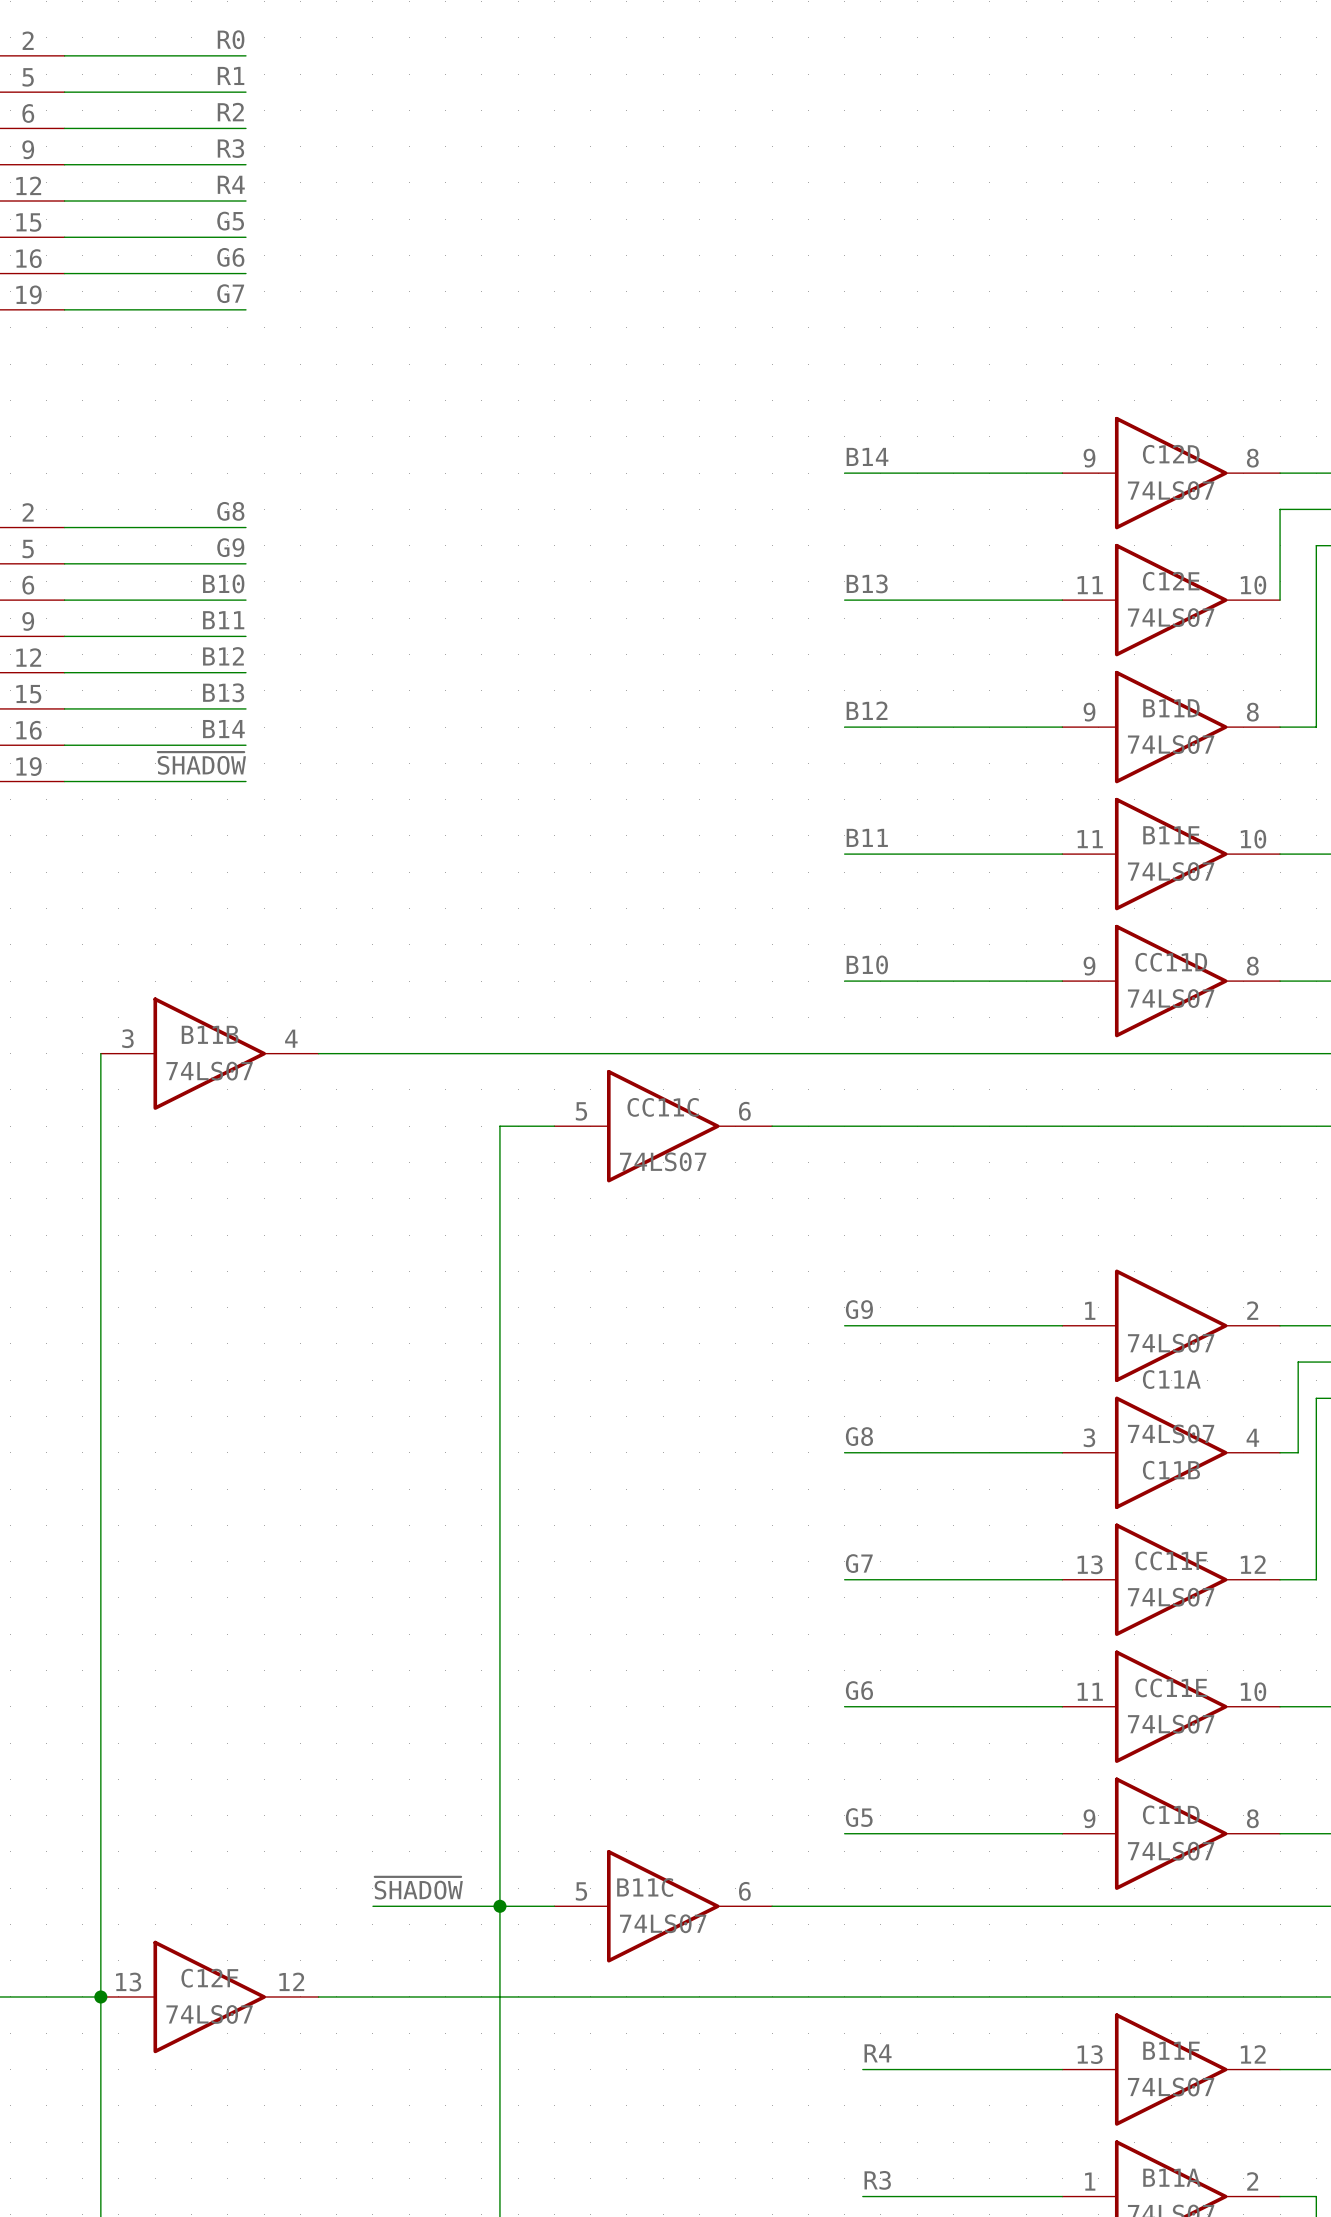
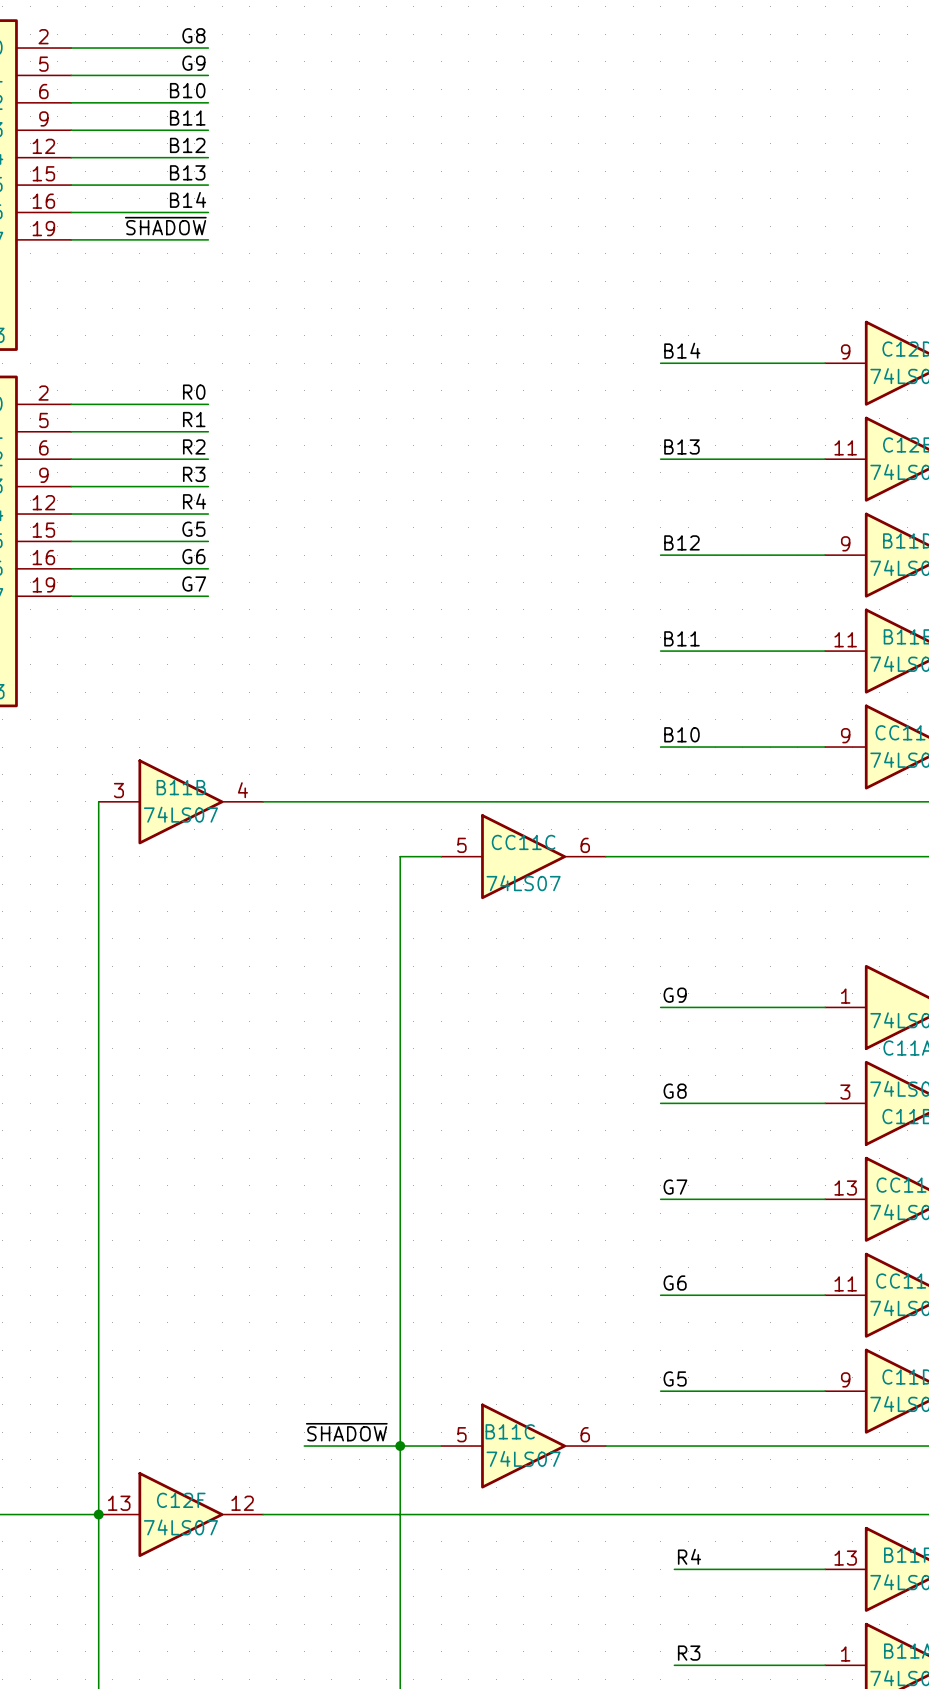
label: R0 (231, 39) -> G8 (193, 35)
label: R1 (231, 75) -> G9 (193, 63)
label: R2 (230, 112) -> B10 (187, 90)
label: R3 (230, 148) -> B11 (187, 118)
label: R4 (231, 184) -> B12 (187, 145)
label: G5 (230, 221) -> B13 (187, 172)
label: G6 (230, 257) -> B14 (188, 199)
label: G7 (230, 293) -> ~{SHADOW} (165, 226)
label: G8 (230, 511) -> R0 (194, 392)
label: G9 (230, 547) -> R1 (194, 419)
label: B10 (223, 583) -> R2 (194, 446)
label: B11 (223, 620) -> R3 (194, 474)
label: B12 (223, 656) -> R4 (194, 501)
label: B13 (223, 692) -> G5 (193, 529)
label: B14 (223, 729) -> G6 (193, 556)
label: ~{SHADOW} (201, 763) -> G7 (194, 584)

